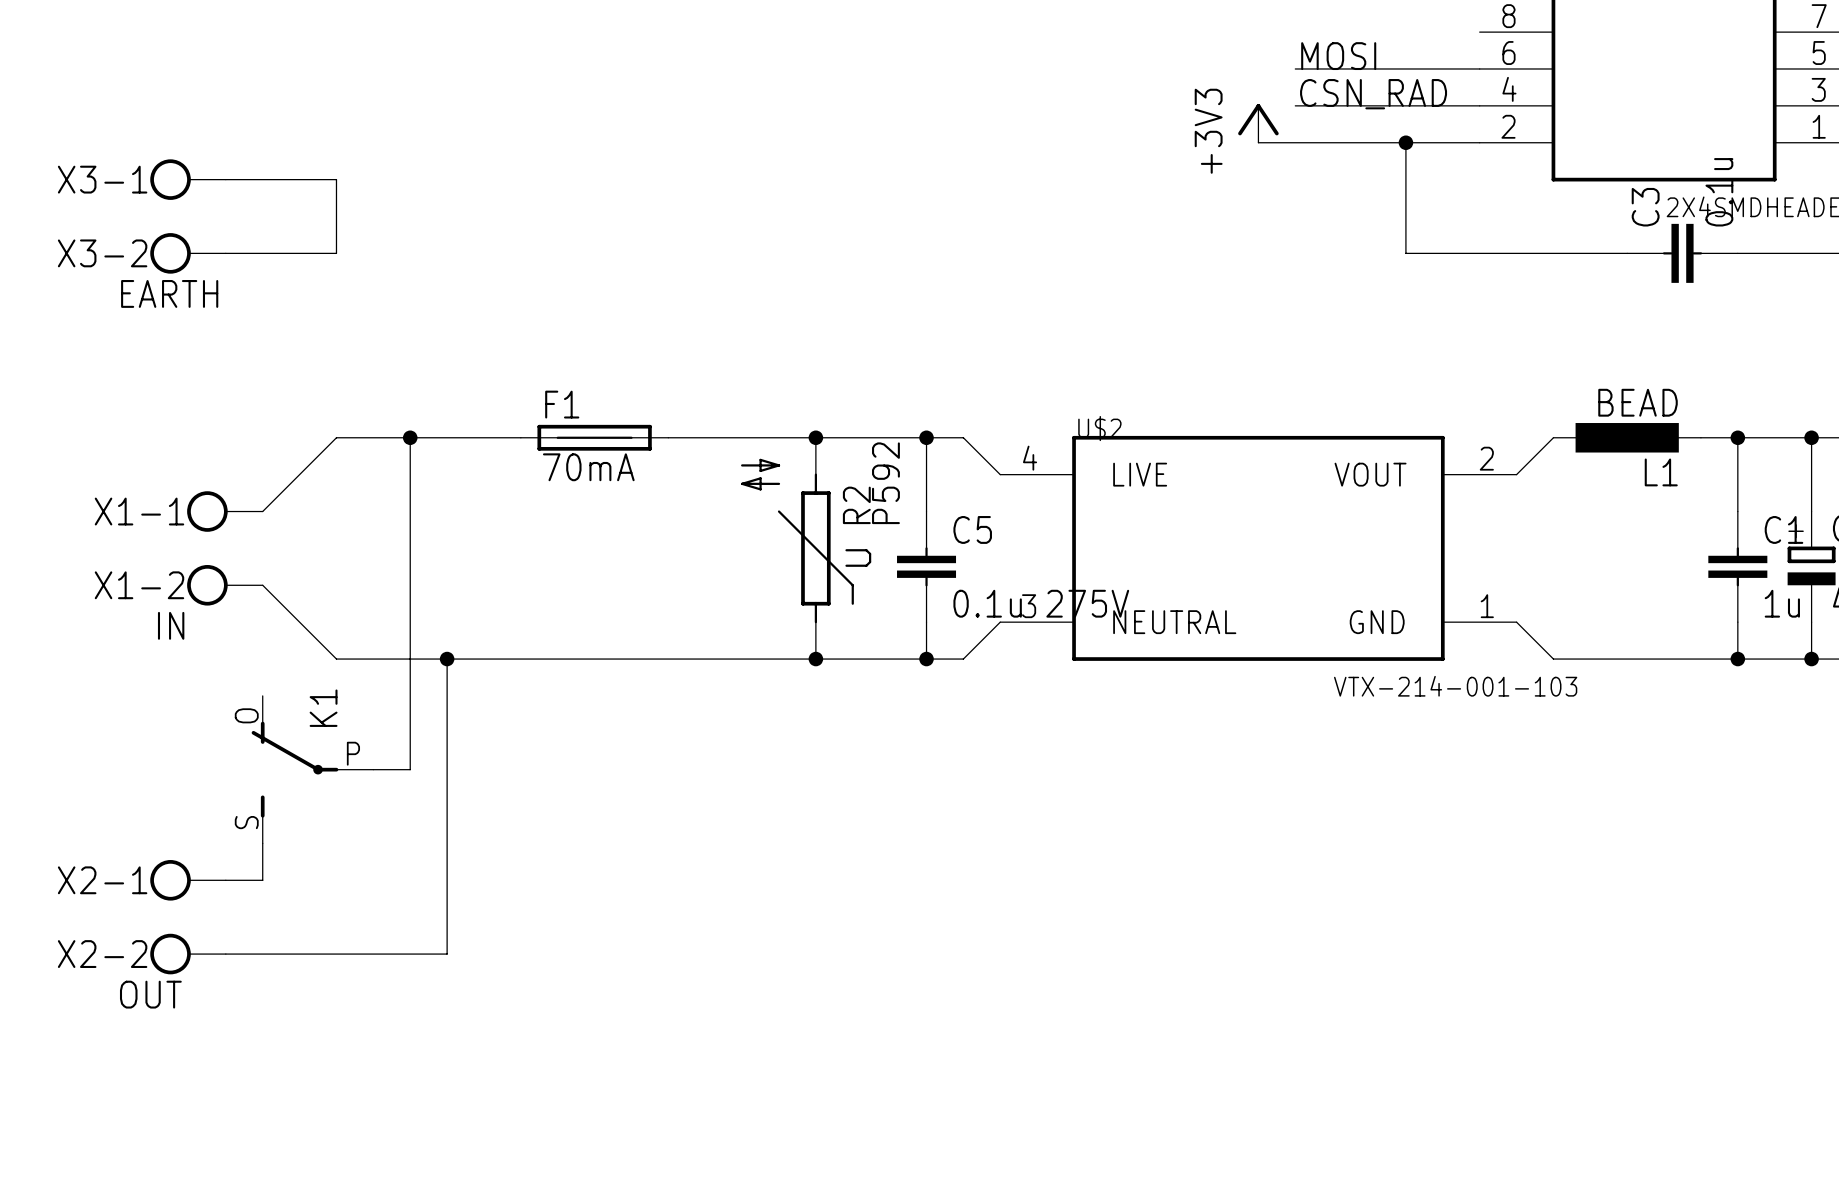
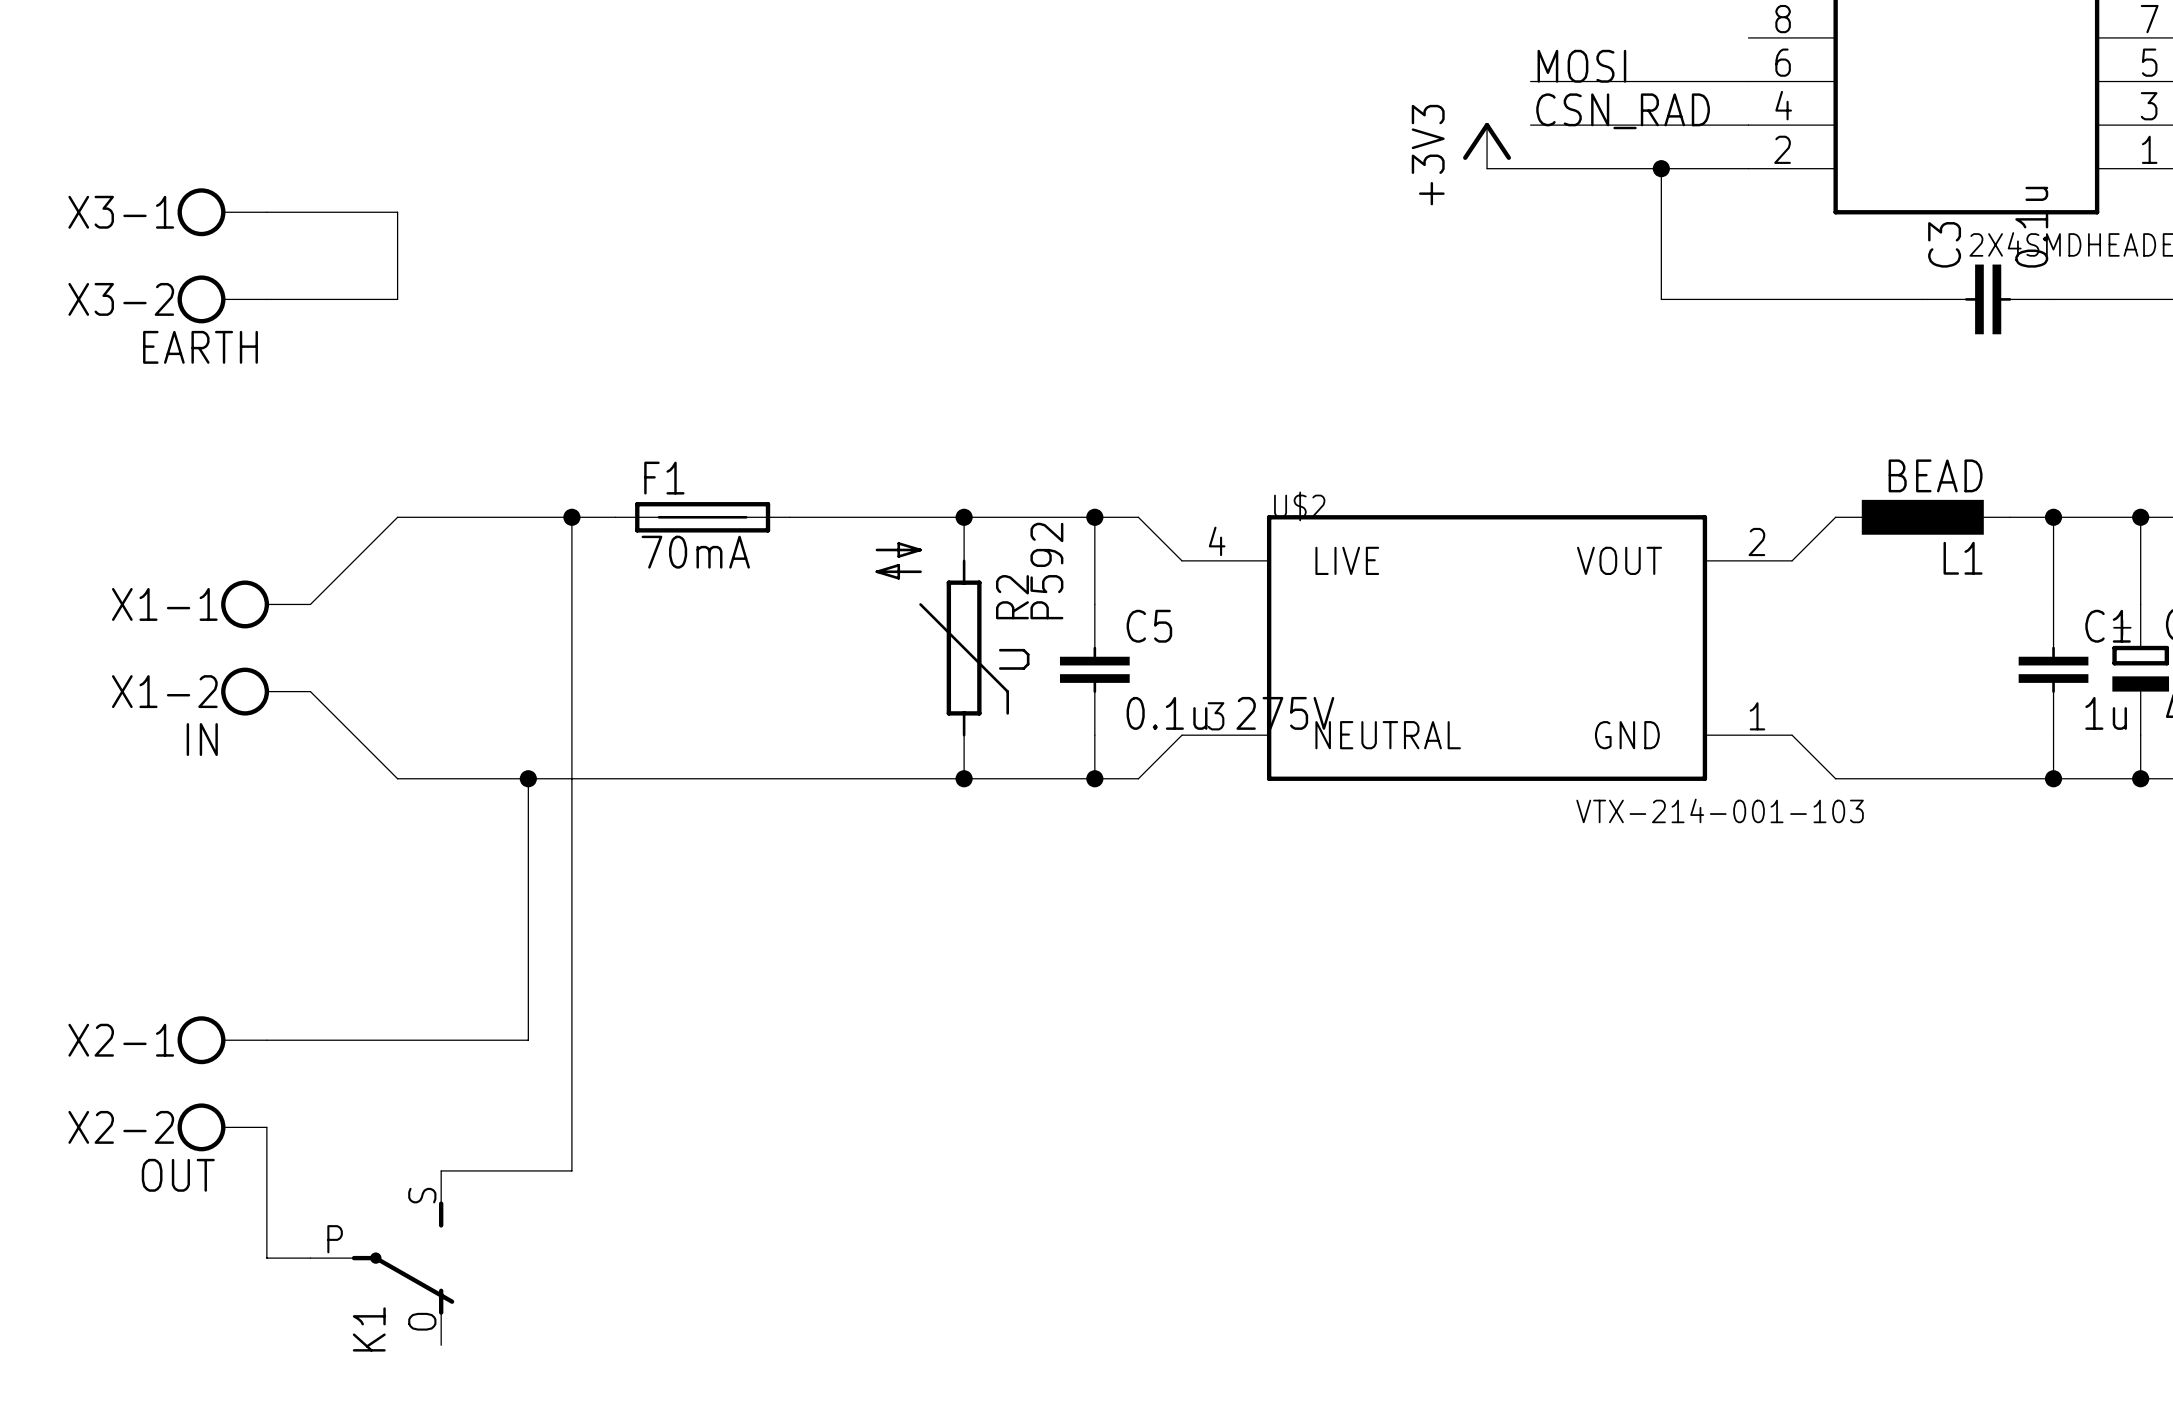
wire: (410, 437) (410, 769) (373, 769) -> none
junction position: (410, 437) -> (571, 517)
wire: none -> (571, 517) (571, 1170) (441, 1170)
K1 rotation: 0° (294, 769) -> 180° (403, 1258)
K1 position: (312, 769) -> (382, 1258)
wire: (262, 843) (262, 880) -> none
wire: (447, 880) (447, 954) (225, 954) -> (528, 1040) (310, 1040)
wire: none -> (266, 1127) (266, 1258) (310, 1258)

